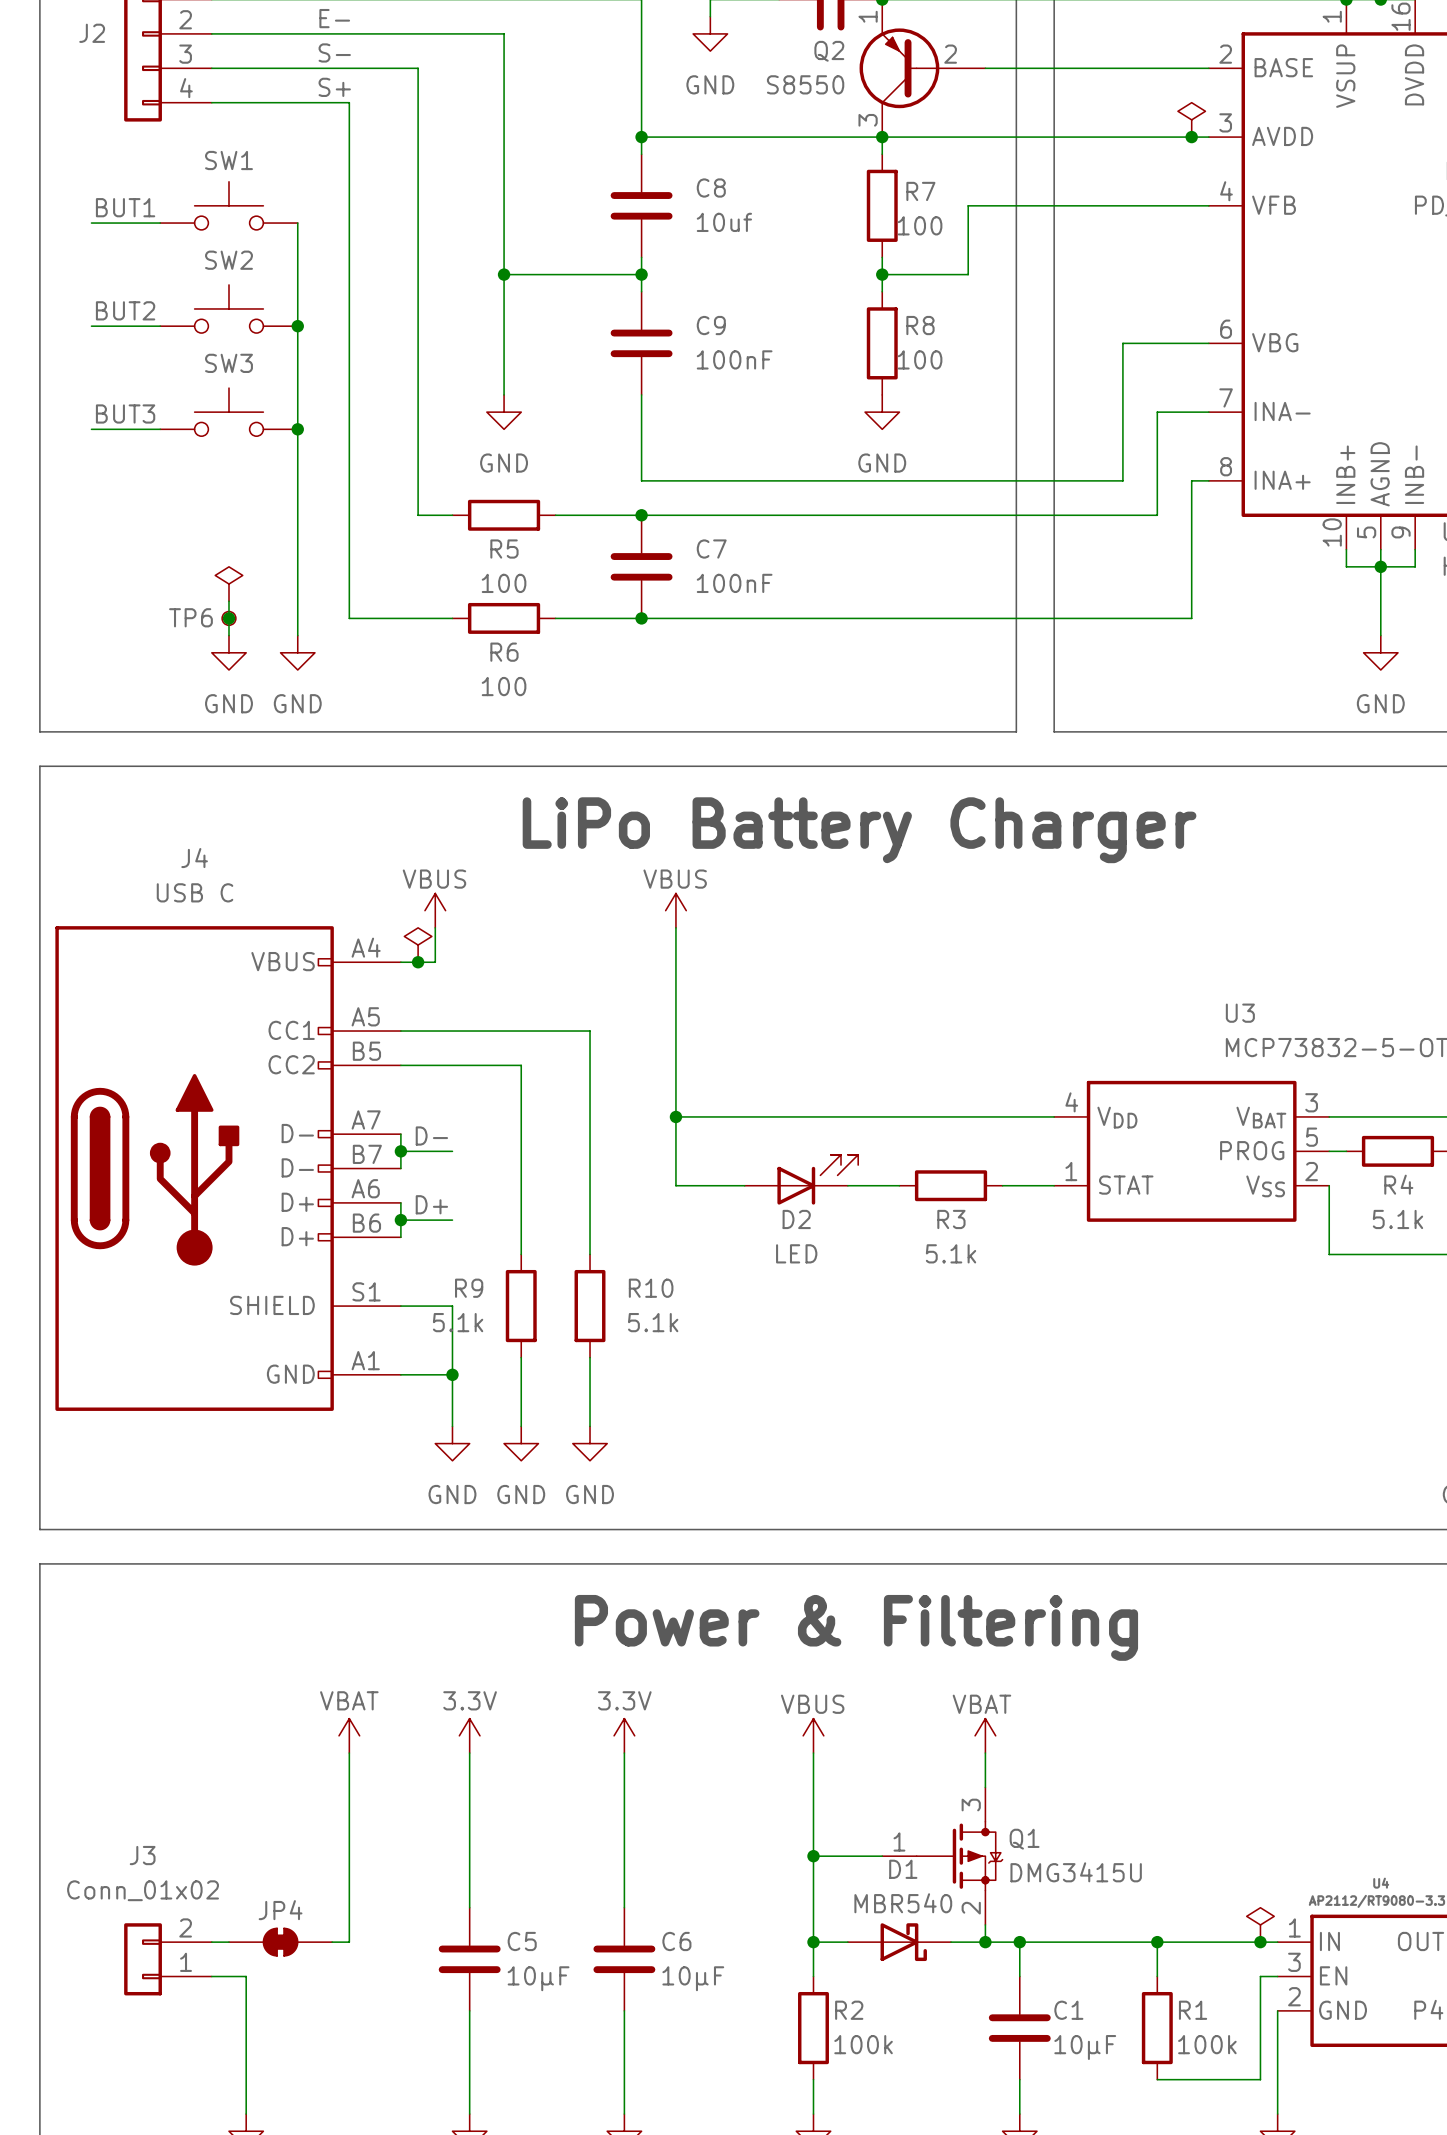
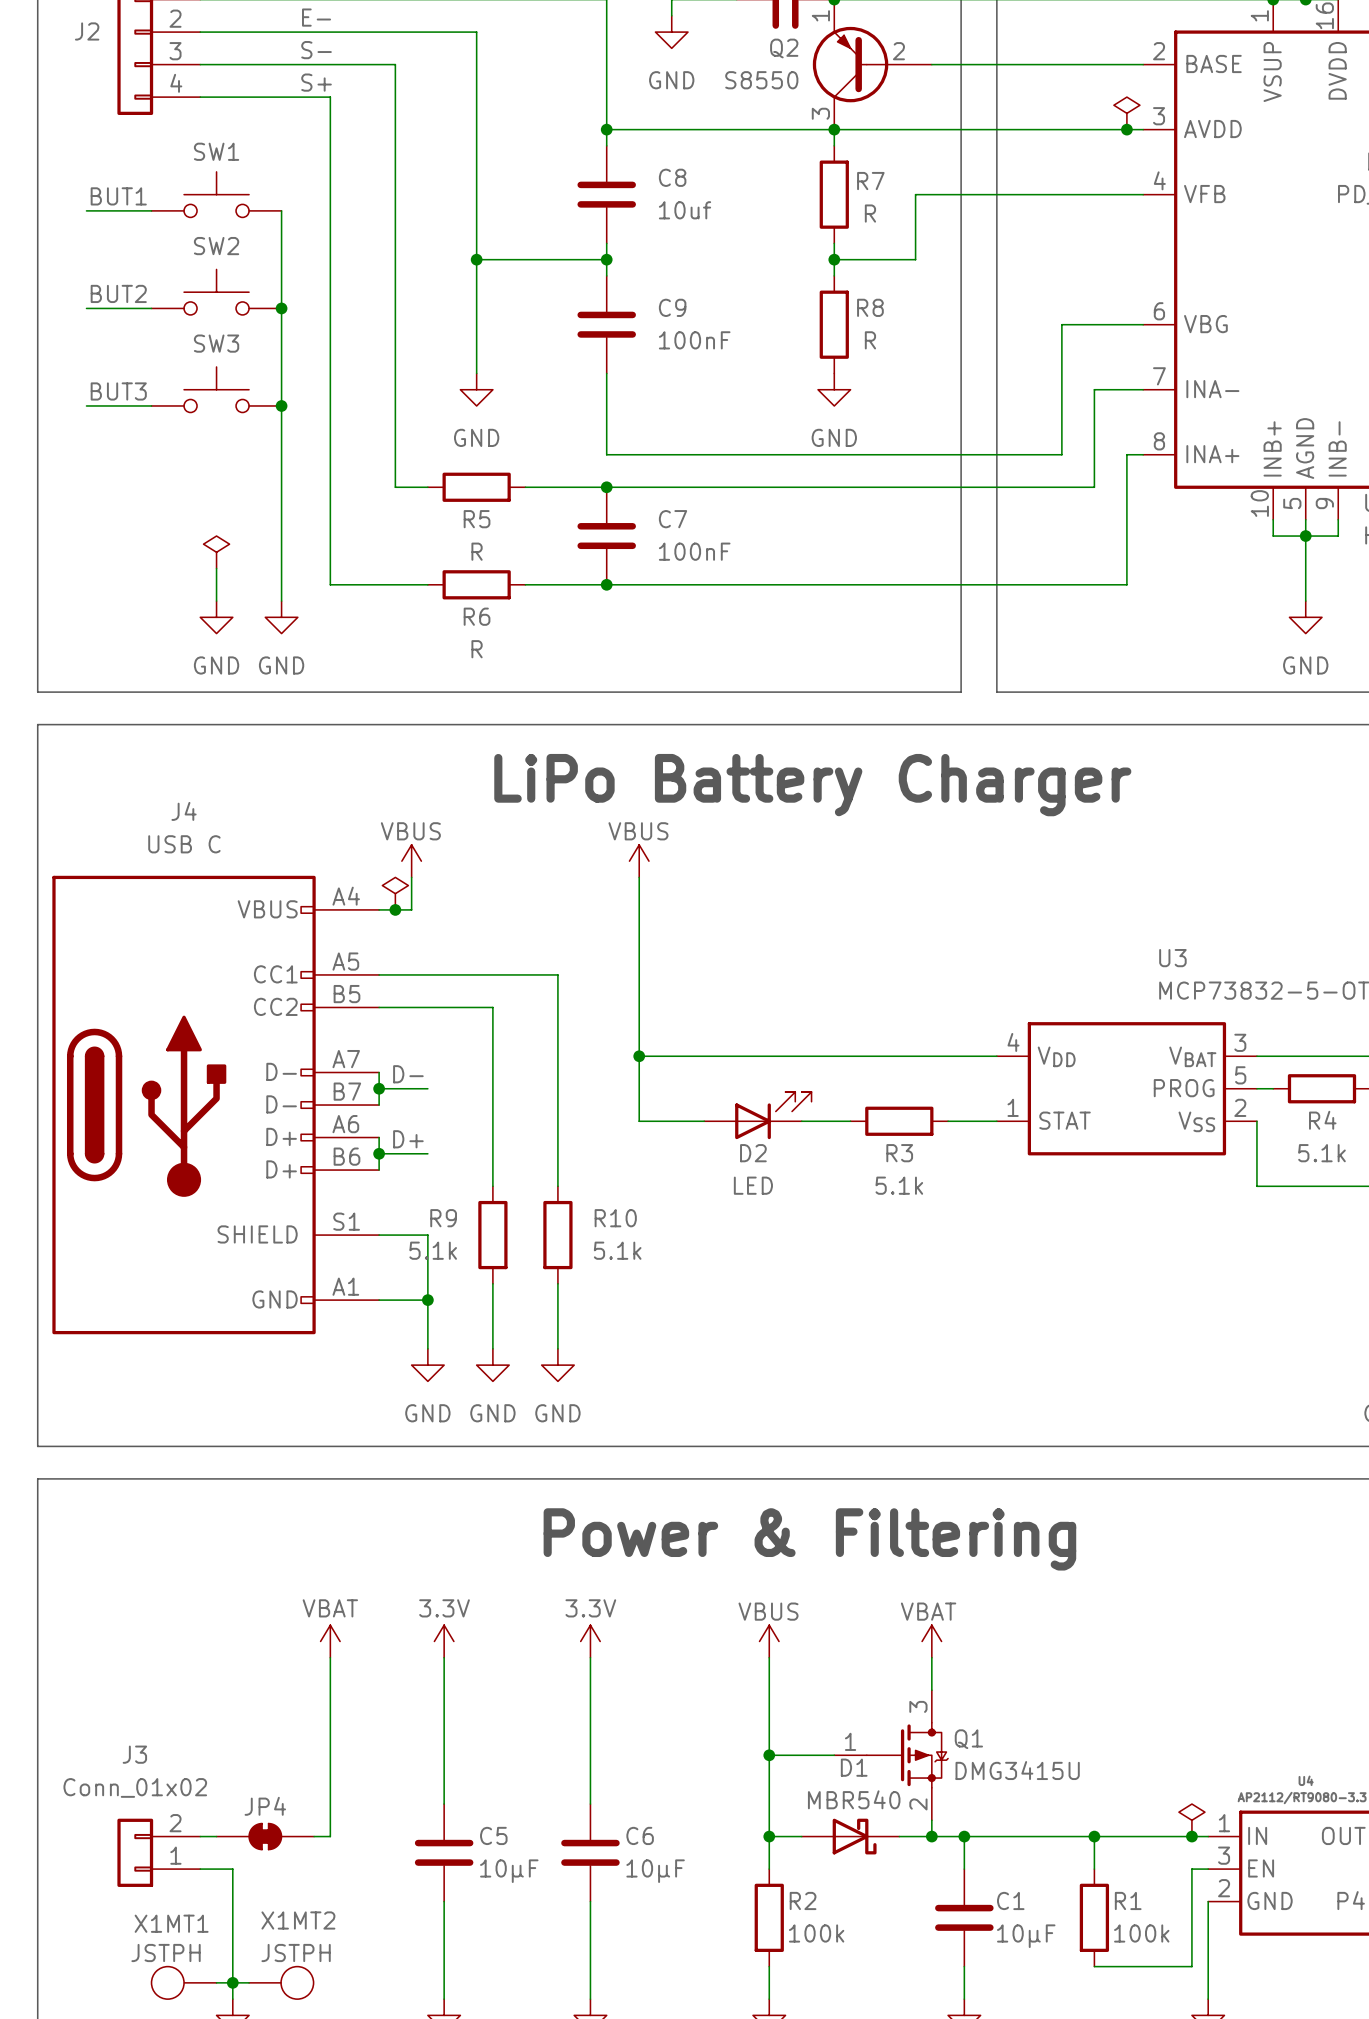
R7 value: 100 (920, 225) -> R (870, 213)
R8 value: 100 (920, 359) -> R (870, 340)
R5 value: 100 (504, 583) -> R (477, 551)
junction: (228, 618) -> none
TP6: (228, 618) -> none
R6 value: 100 (504, 686) -> R (477, 649)
X1MT1: none -> JSTPH (184, 1982)
wire: none -> (216, 1982) (249, 1982)
junction: none -> (232, 1982)
X1MT2: none -> JSTPH (281, 1982)

